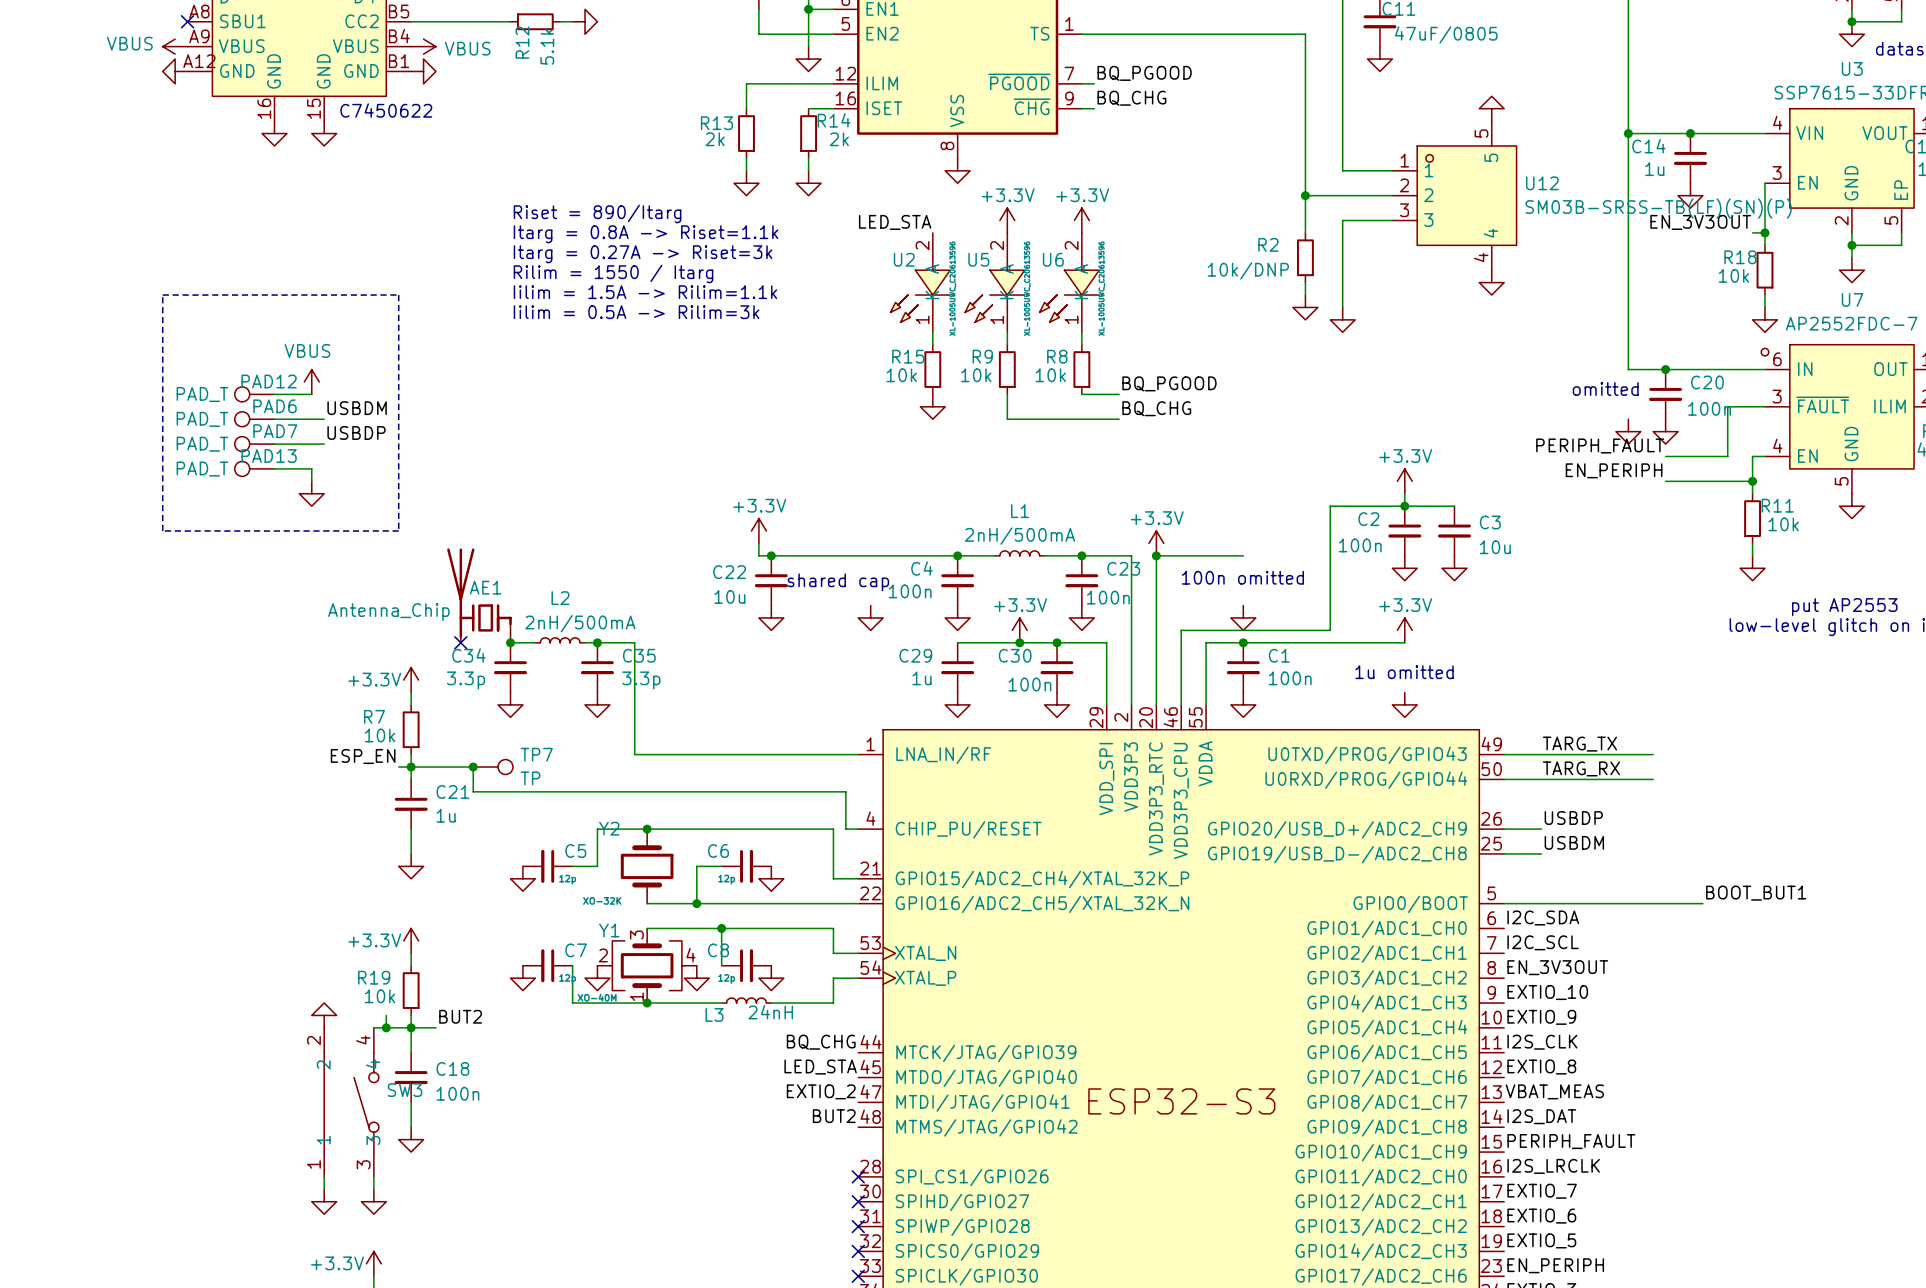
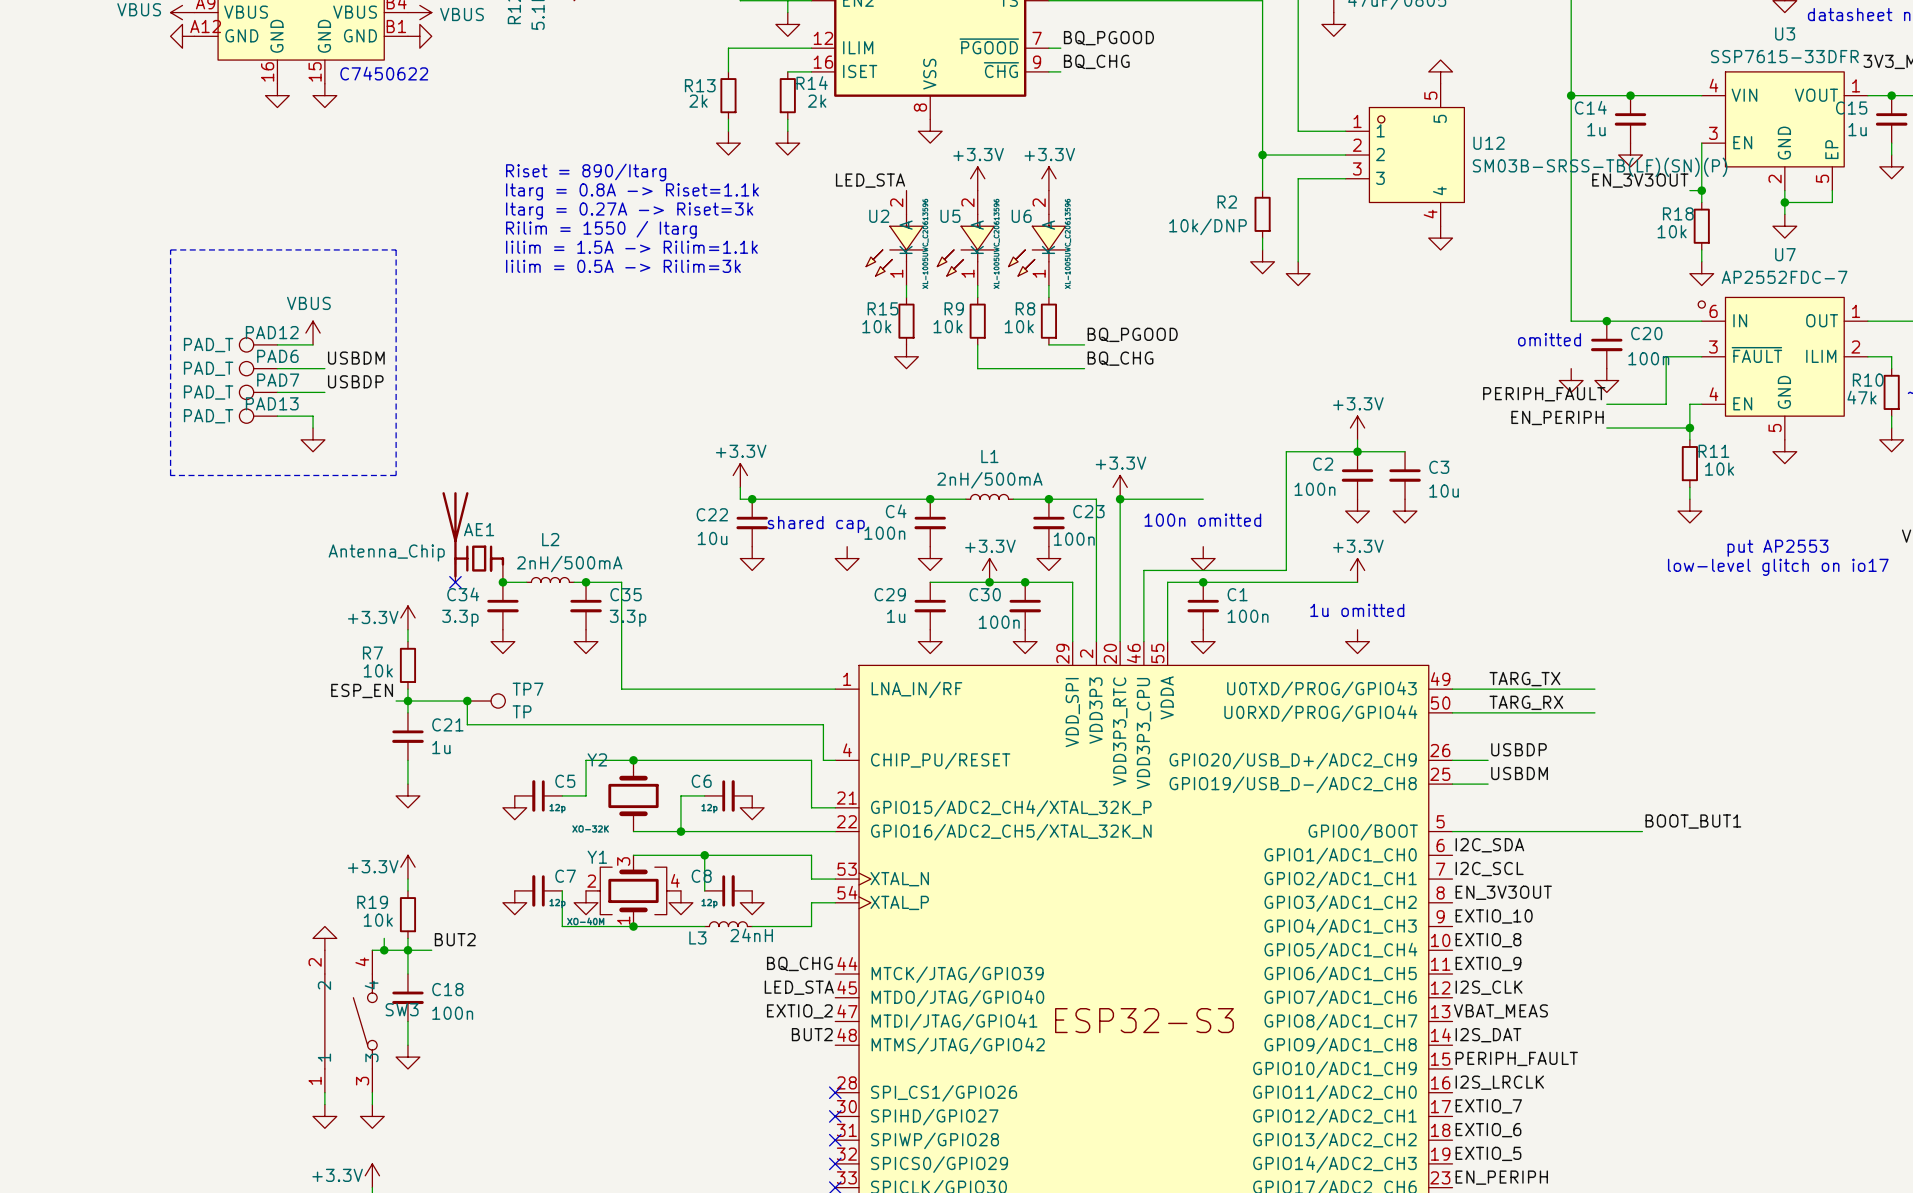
label: EXTIO_9 (1541, 1017) -> EXTIO_8 (1488, 940)
label: I2S_CLK (1542, 1042) -> EXTIO_9 (1488, 963)
label: EXTIO_8 (1541, 1067) -> I2S_CLK (1489, 987)

